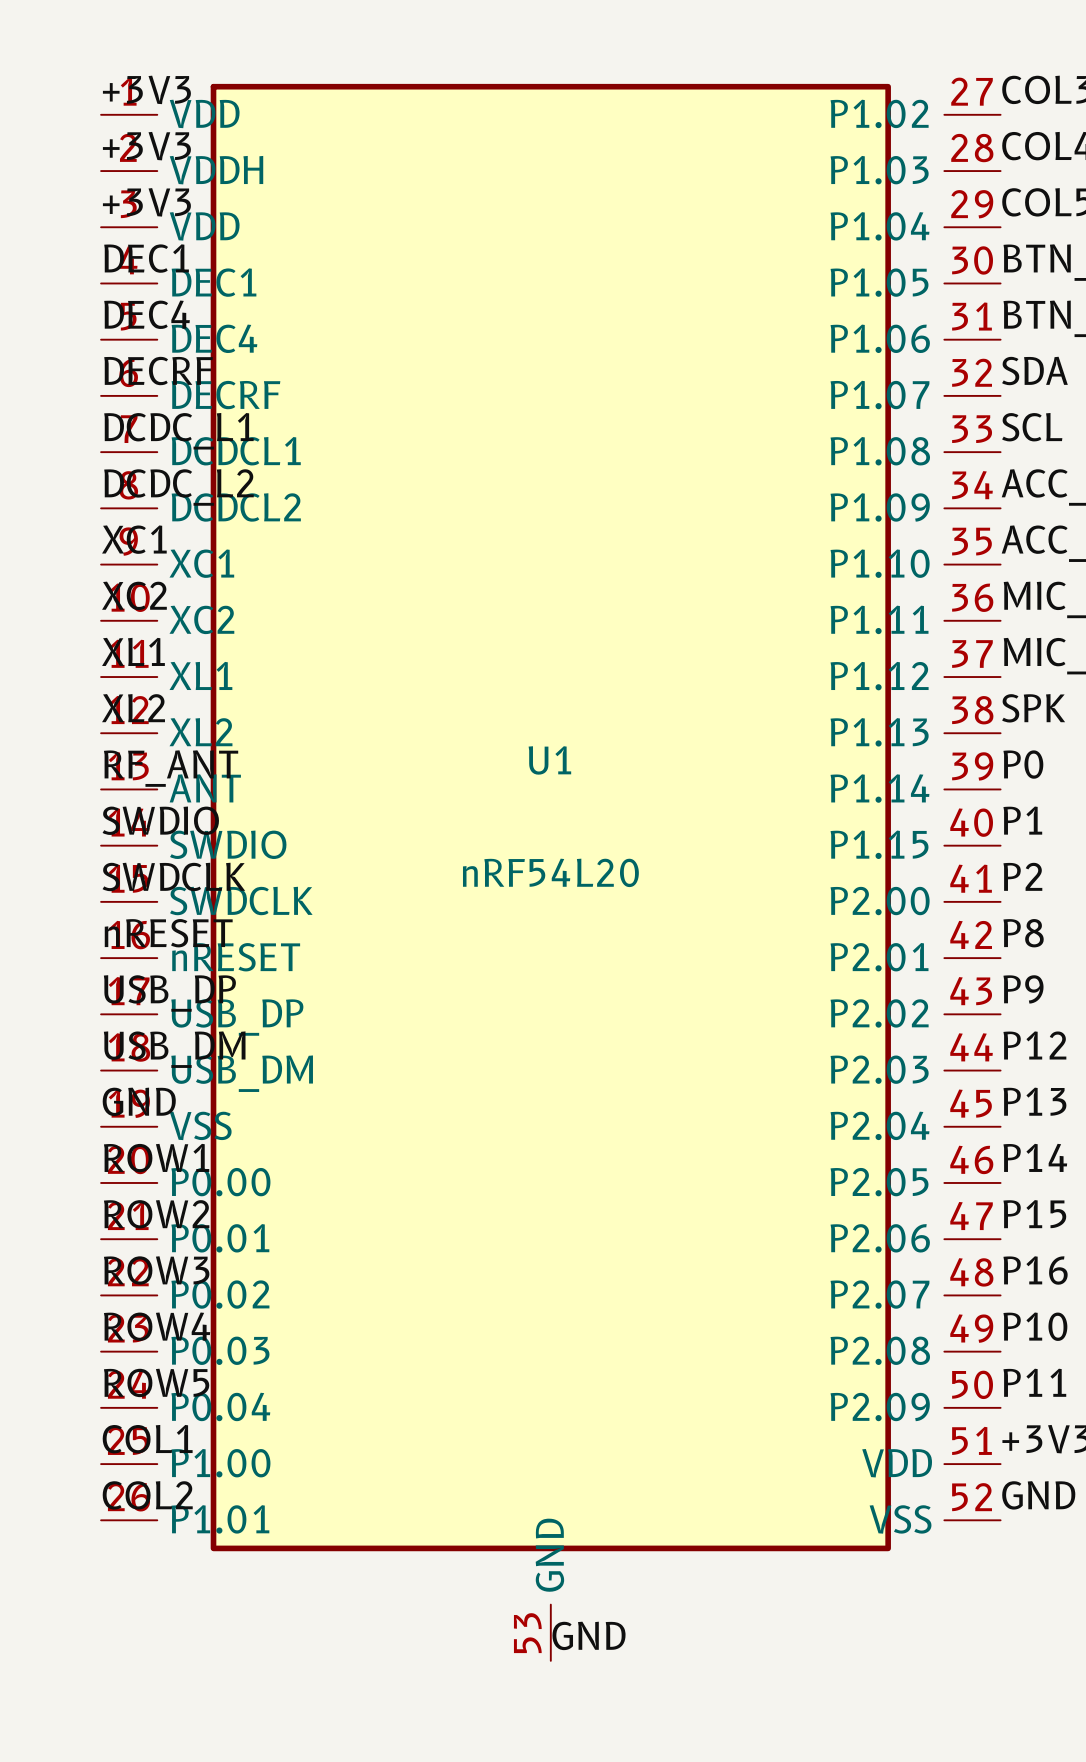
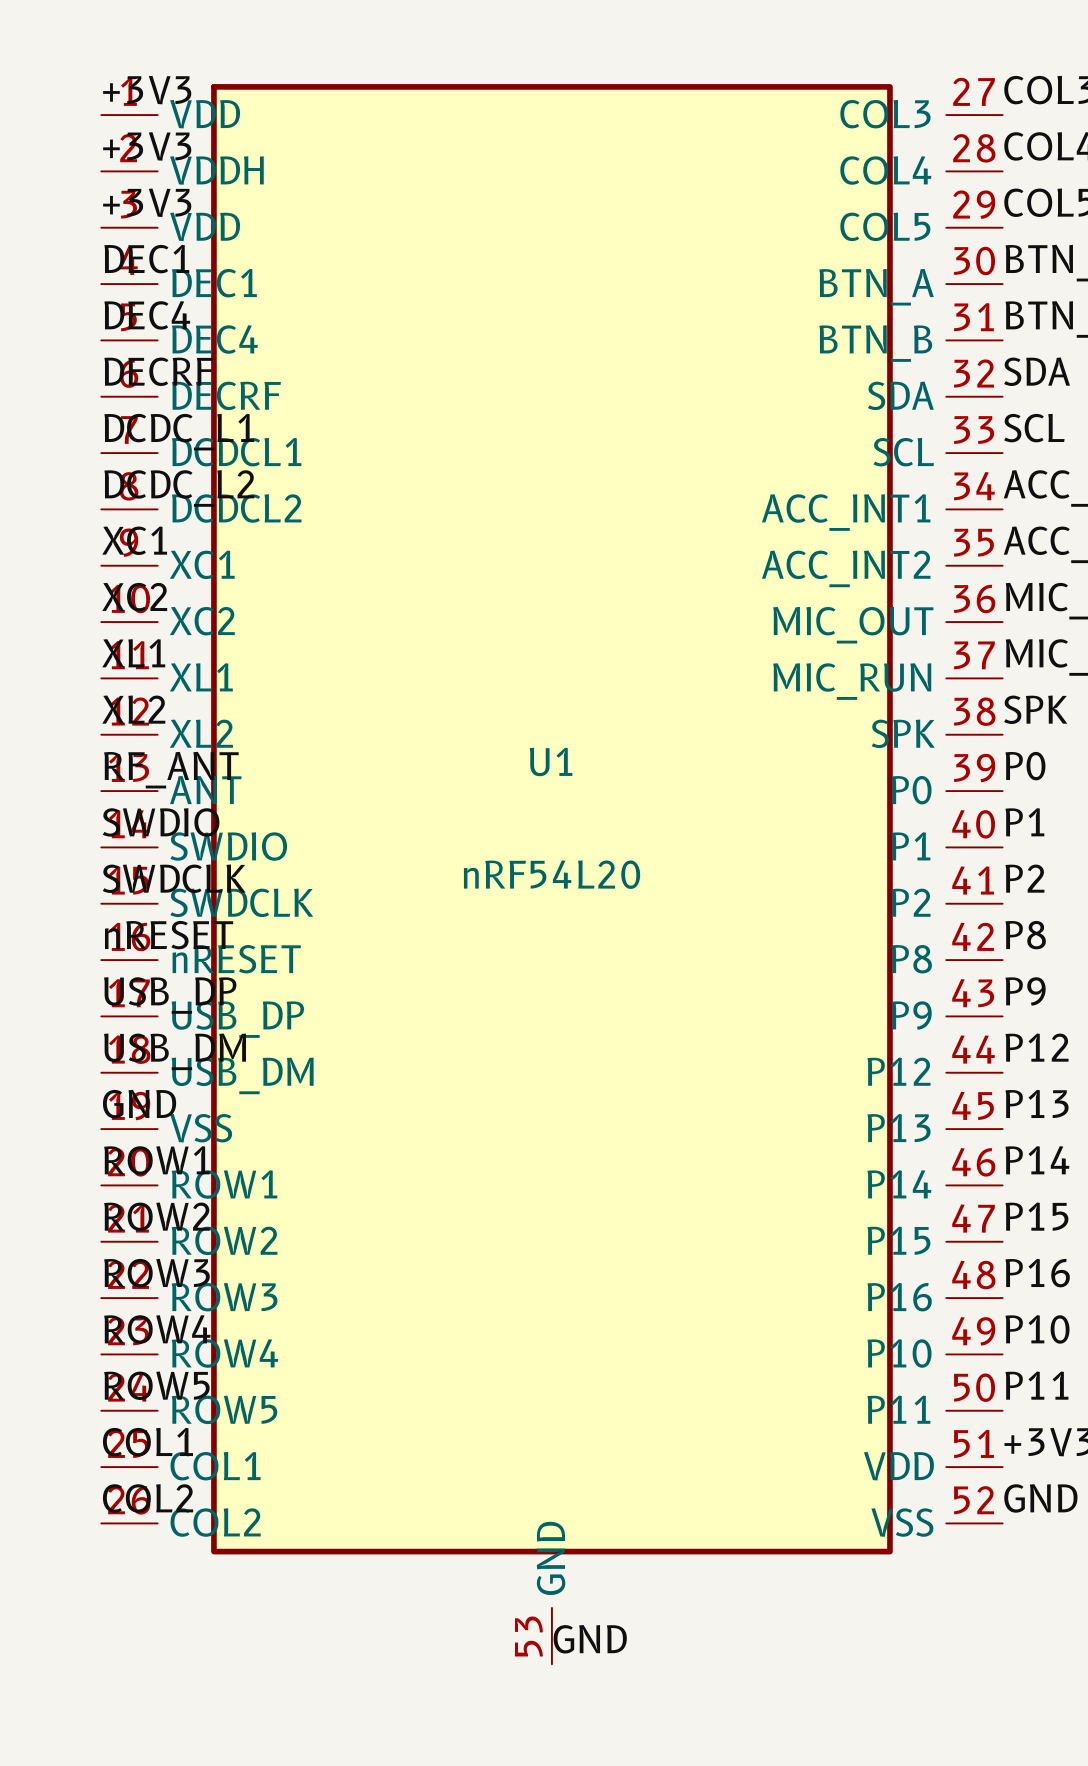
U1 symbol: [101, 83, 1001, 1661] -> [101, 84, 1003, 1665]

